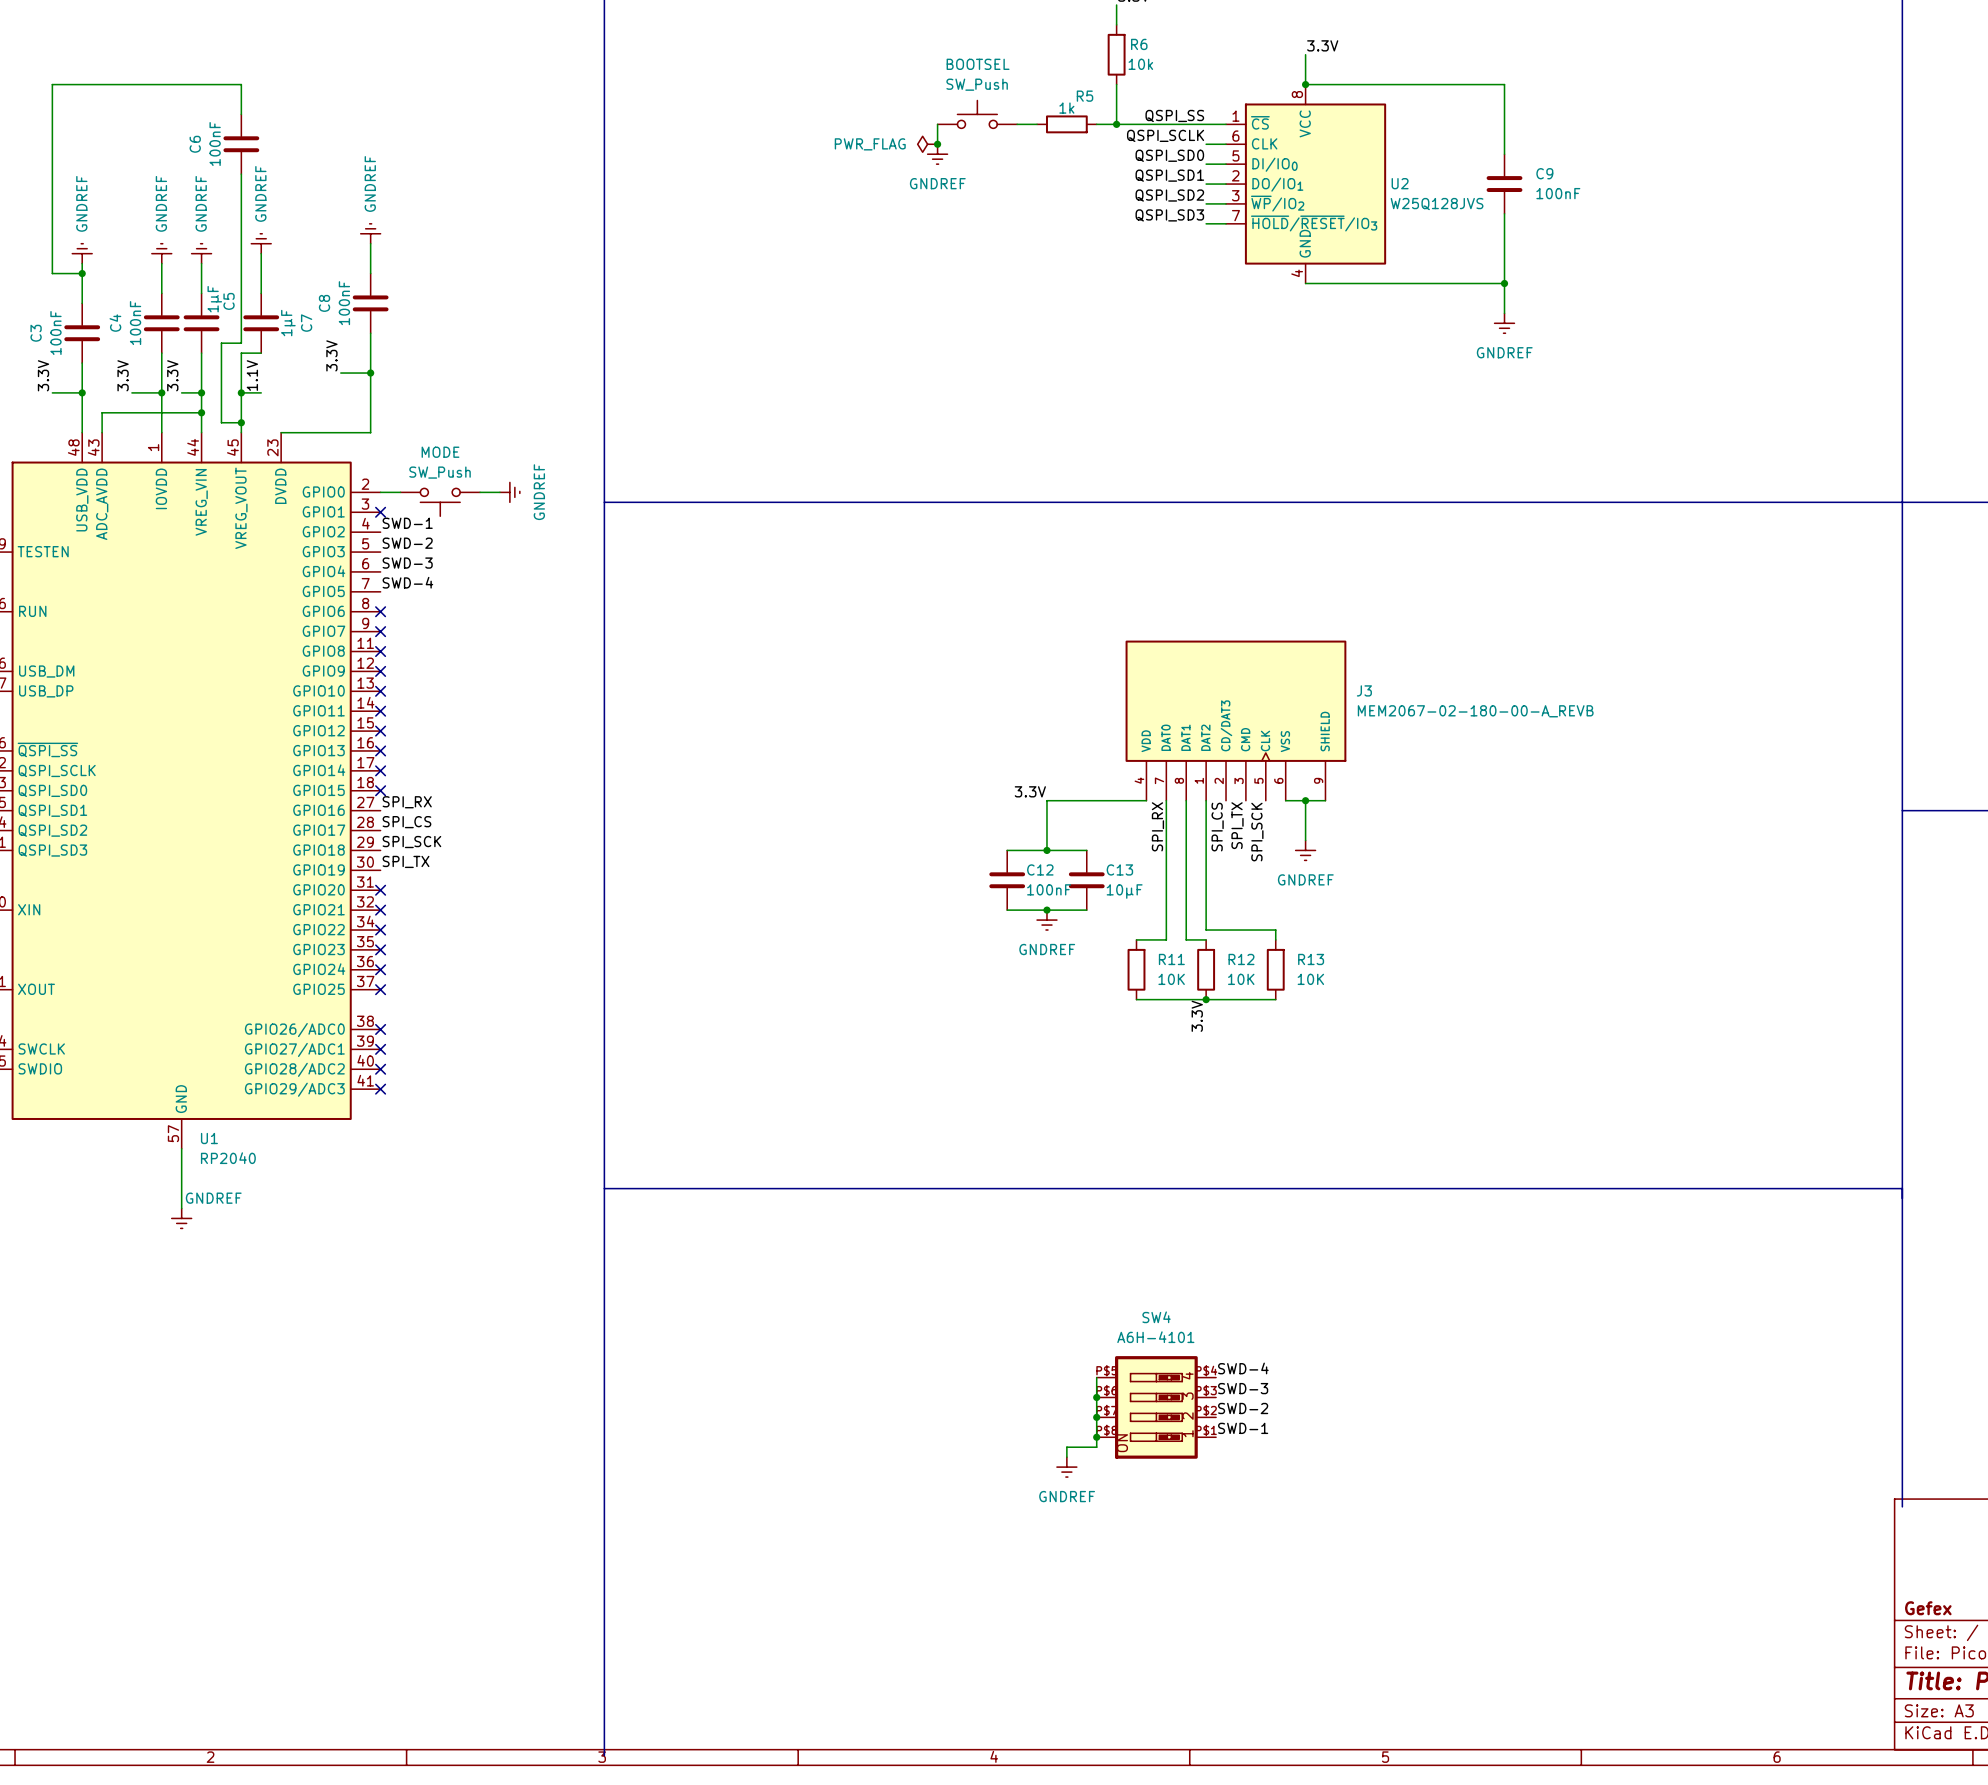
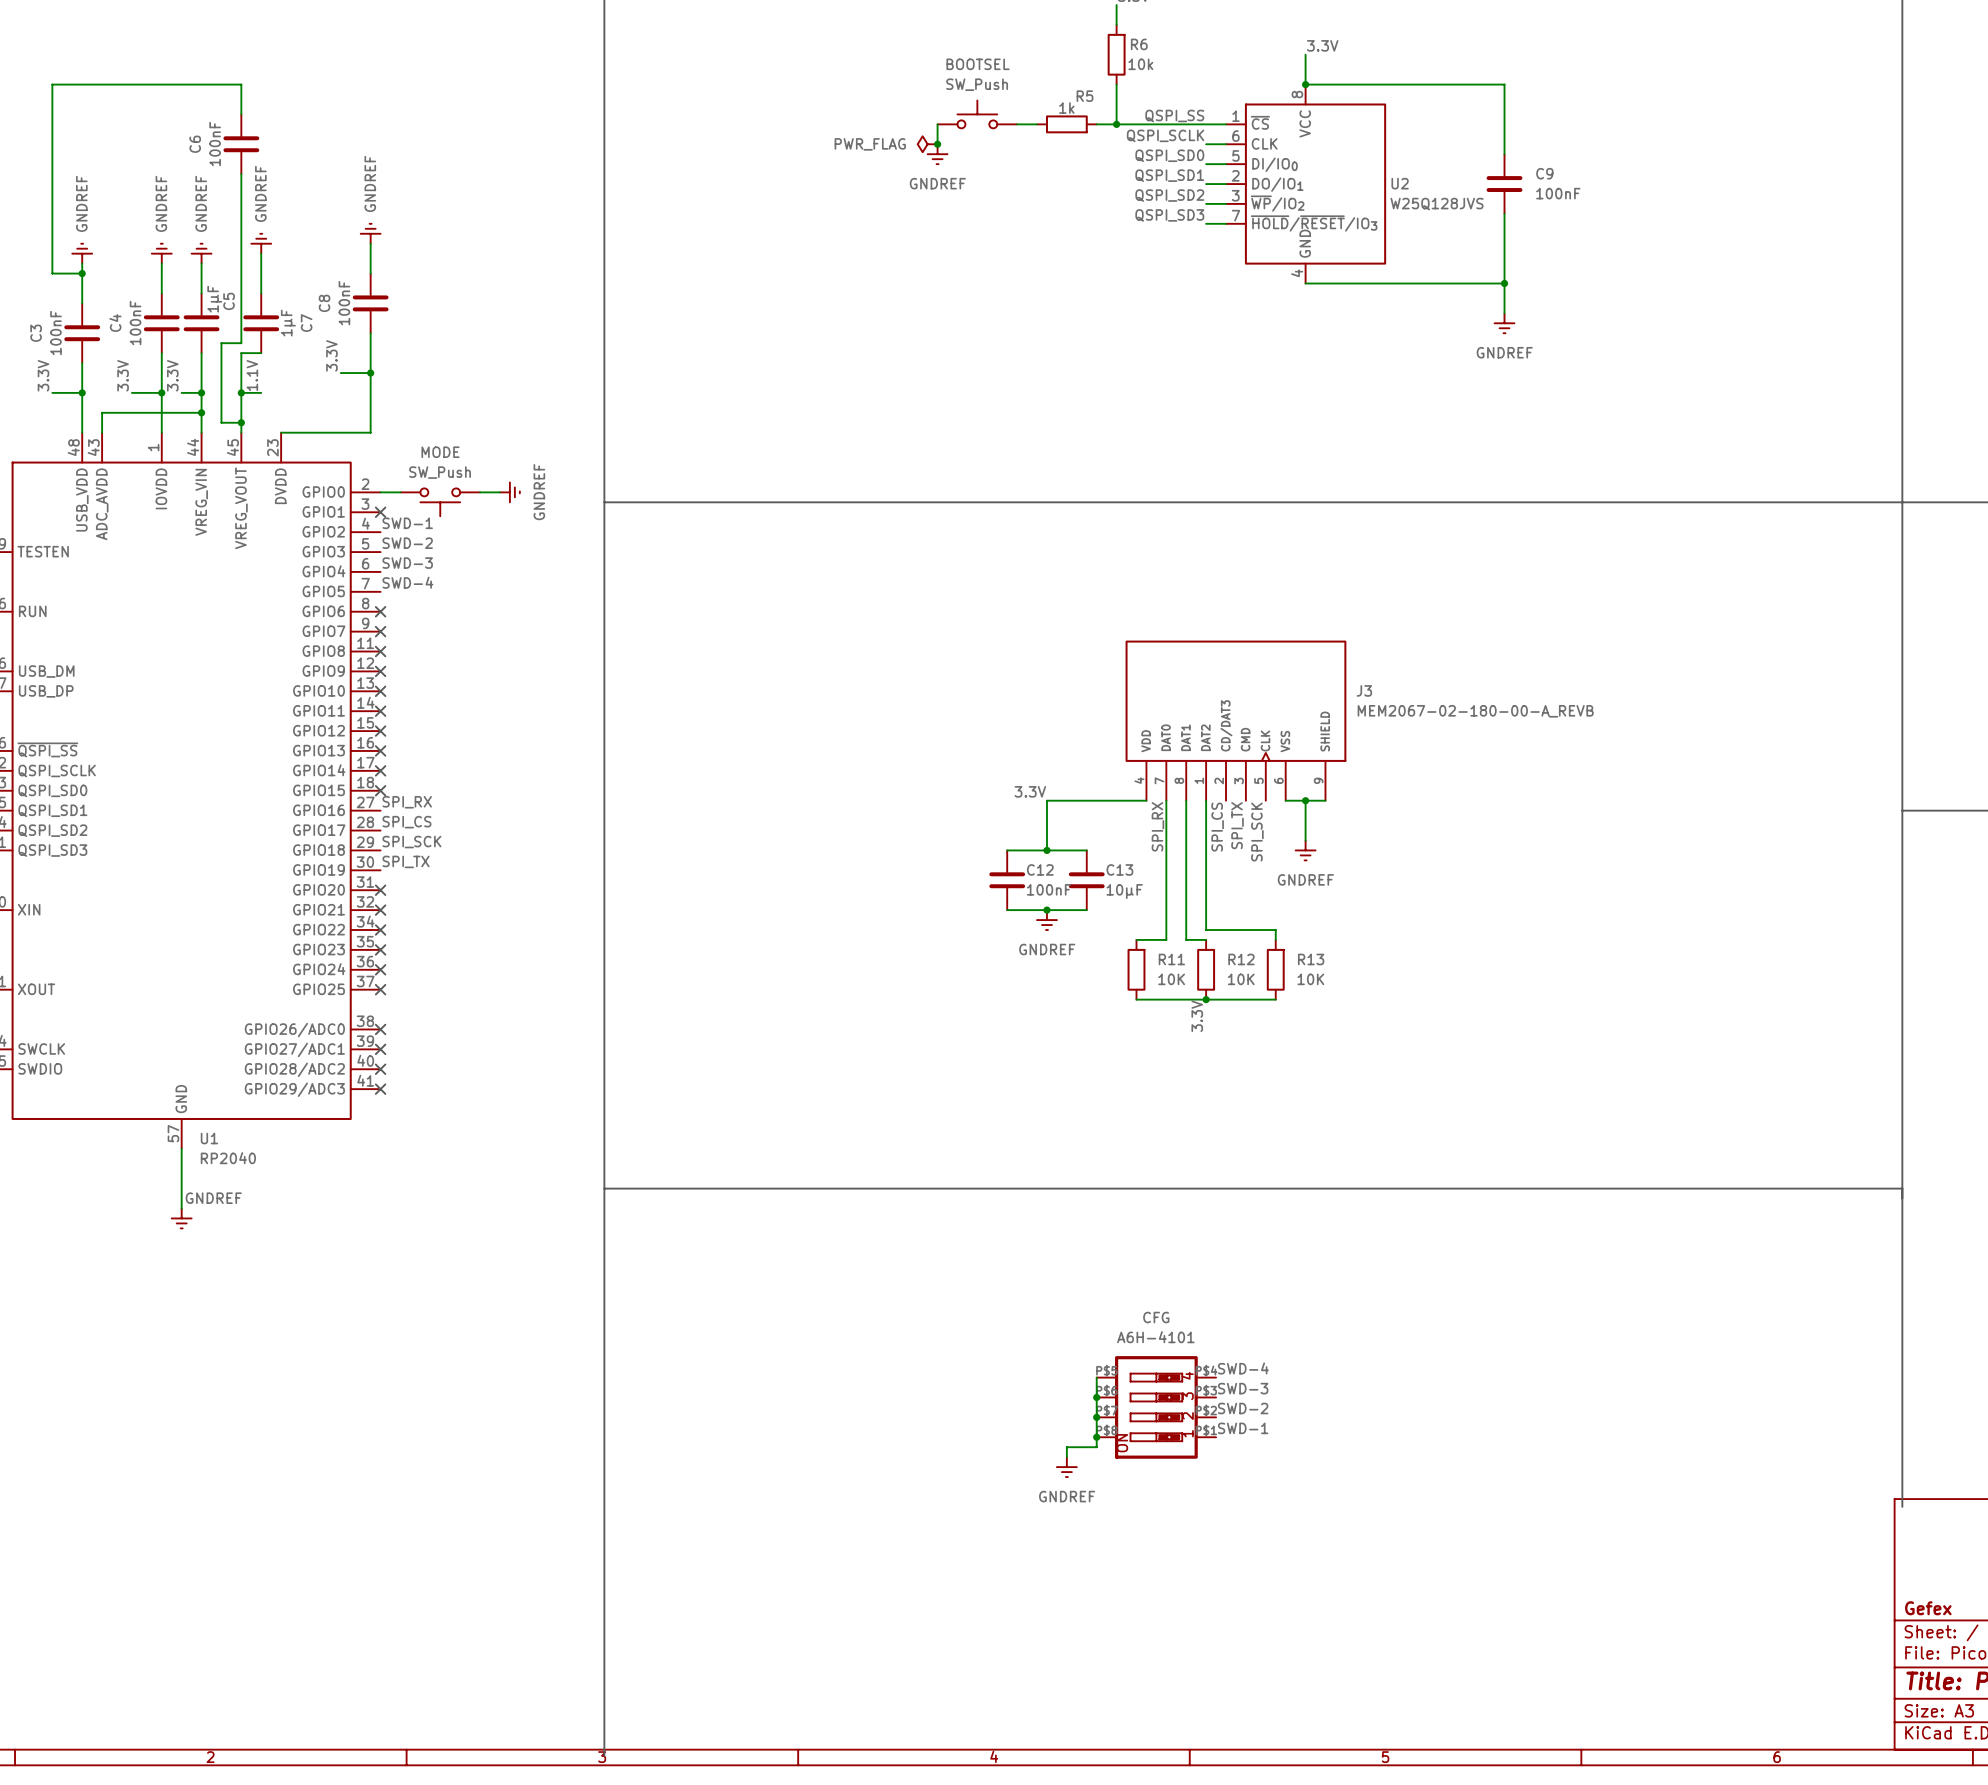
SW4 name: SW4 (1156, 1317) -> CFG (1156, 1317)

